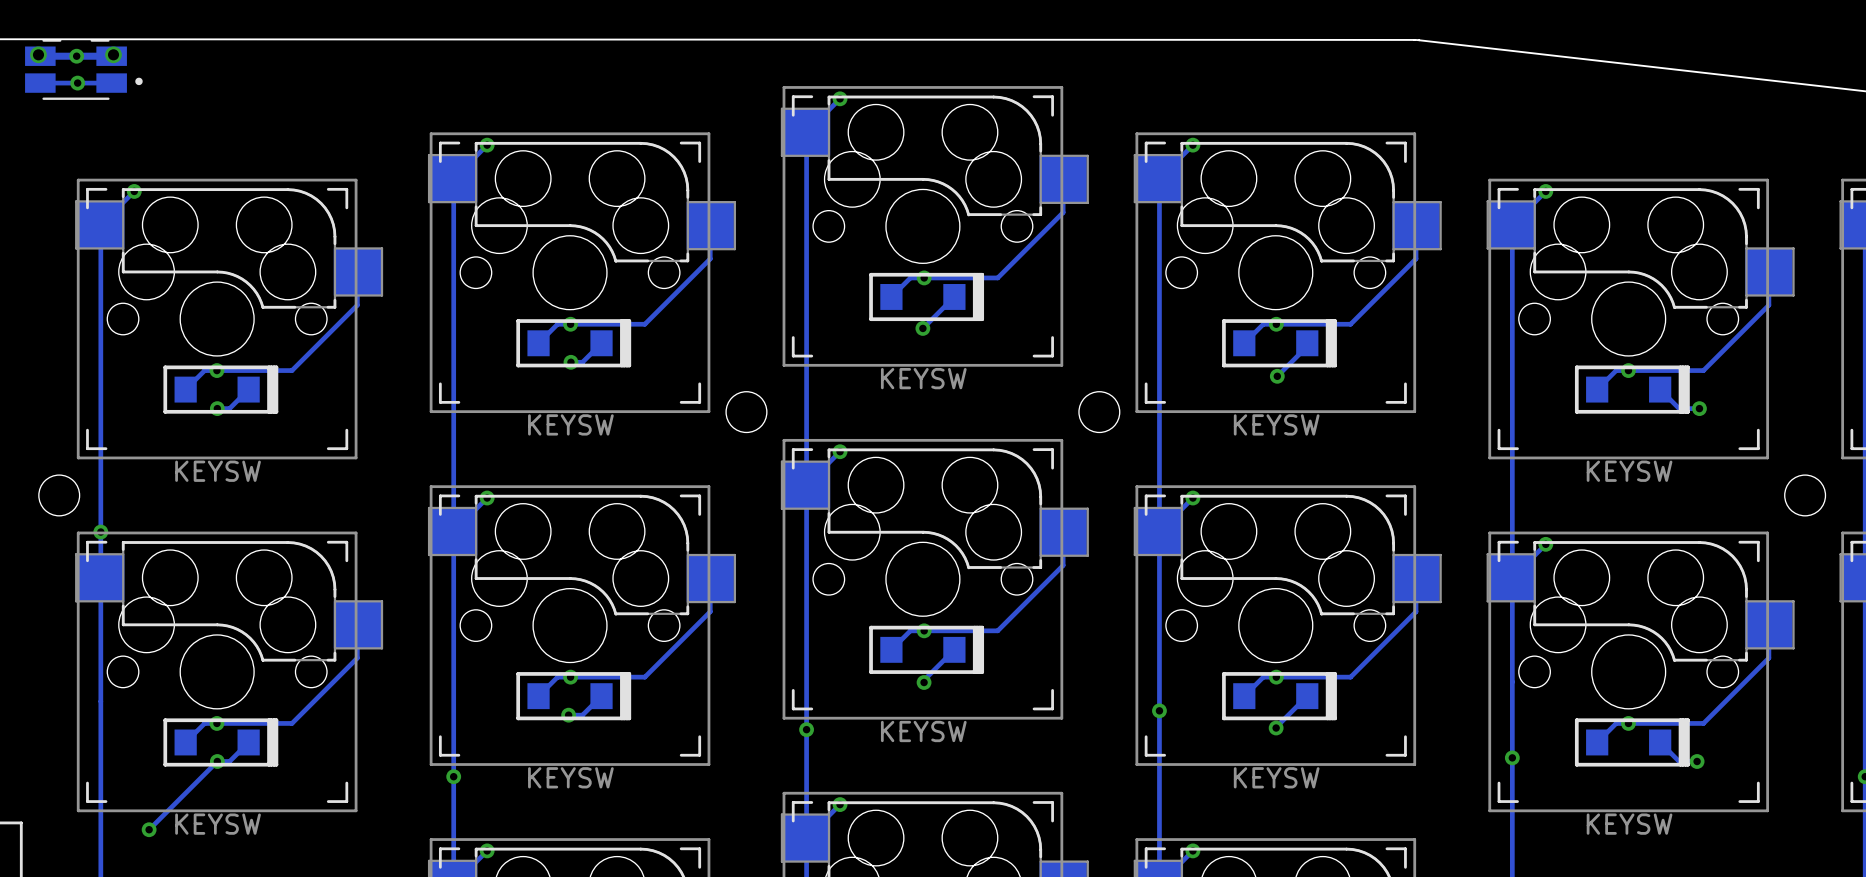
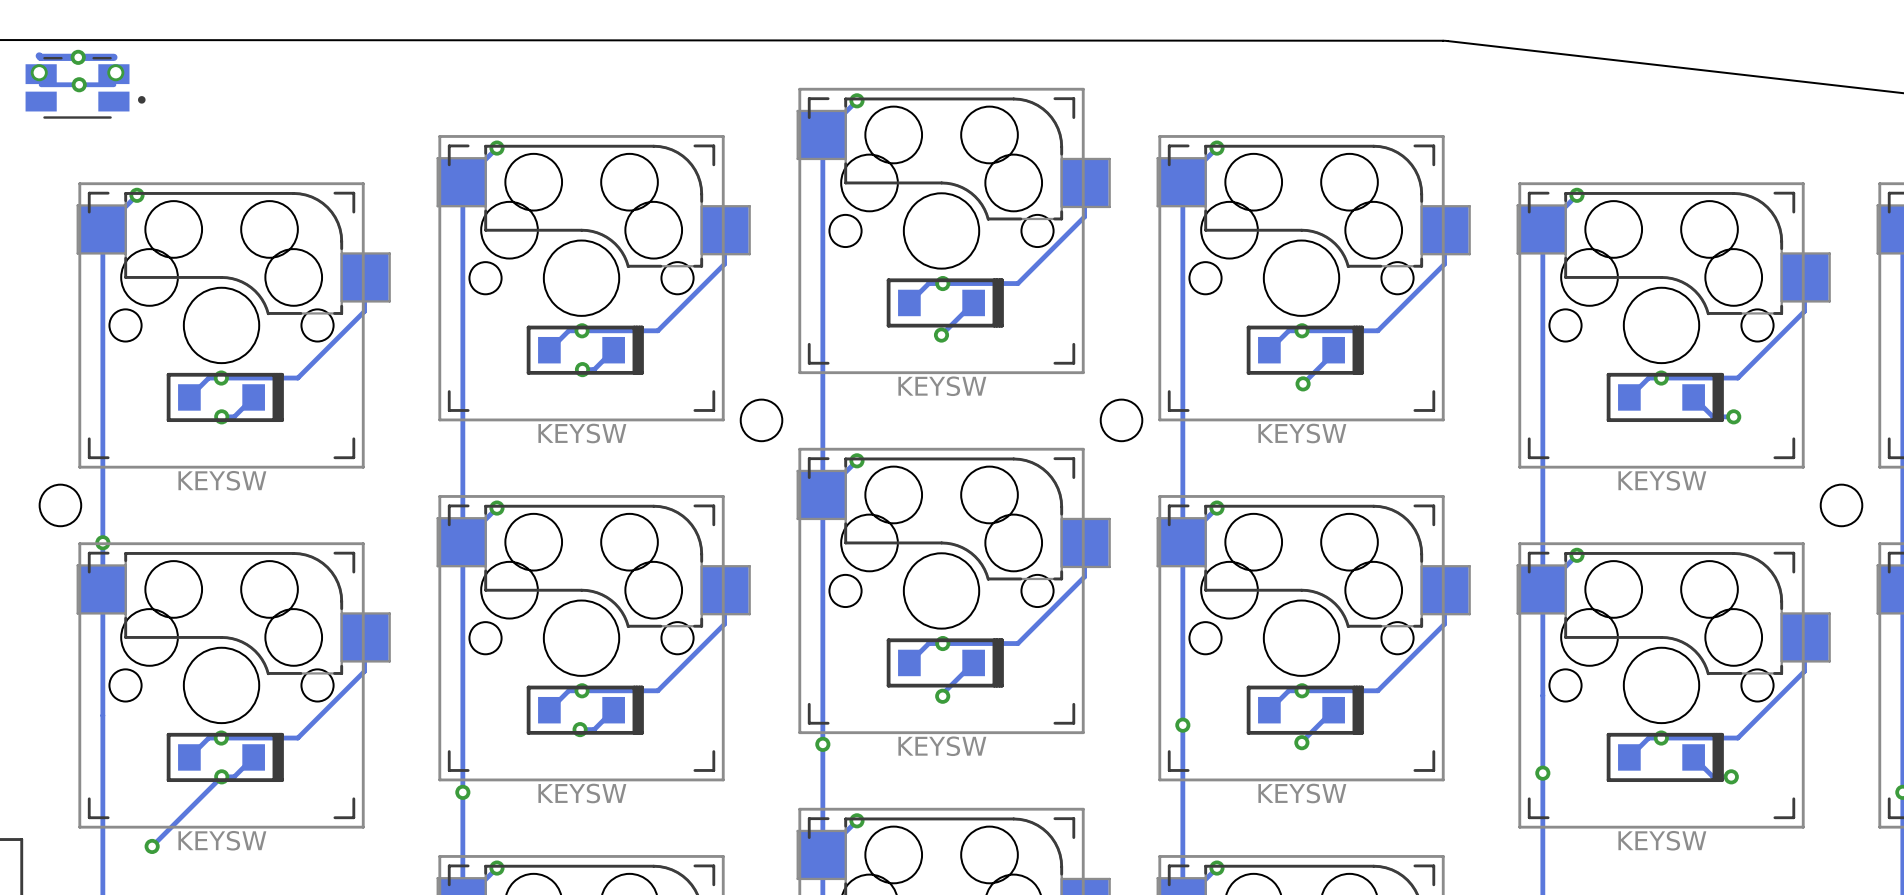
part position: (83, 69) -> (85, 87)

